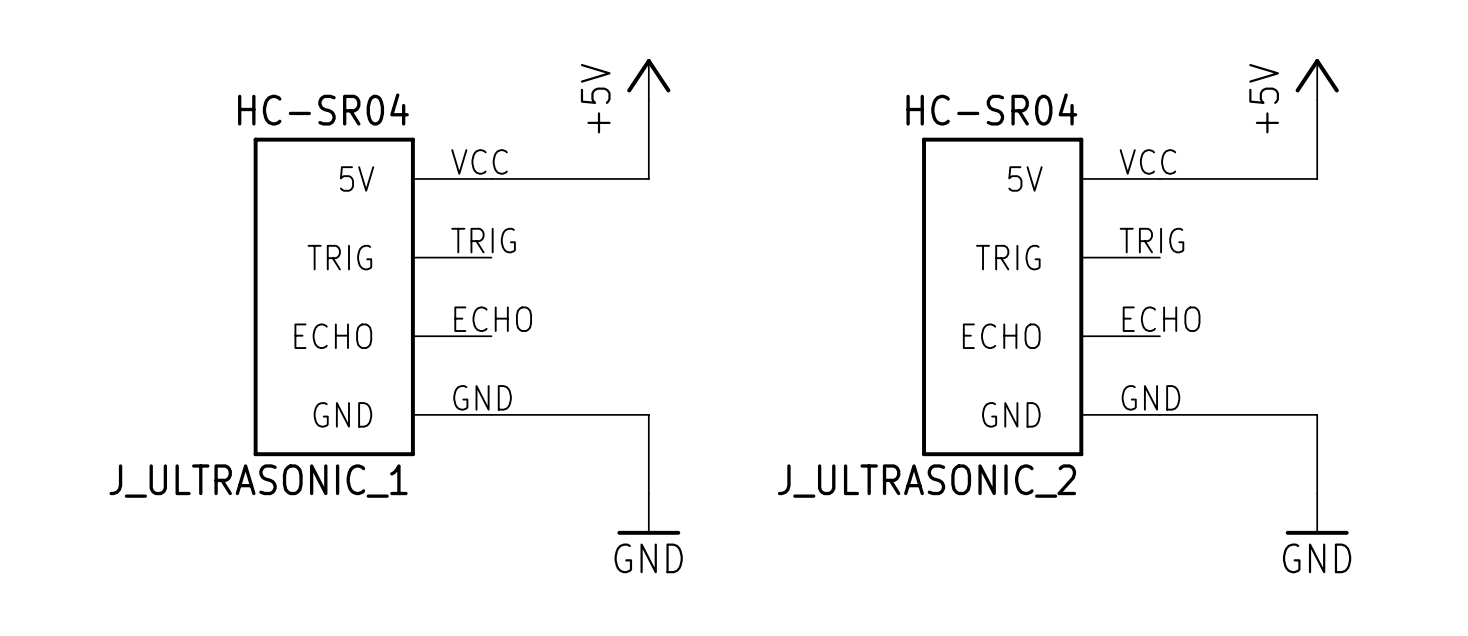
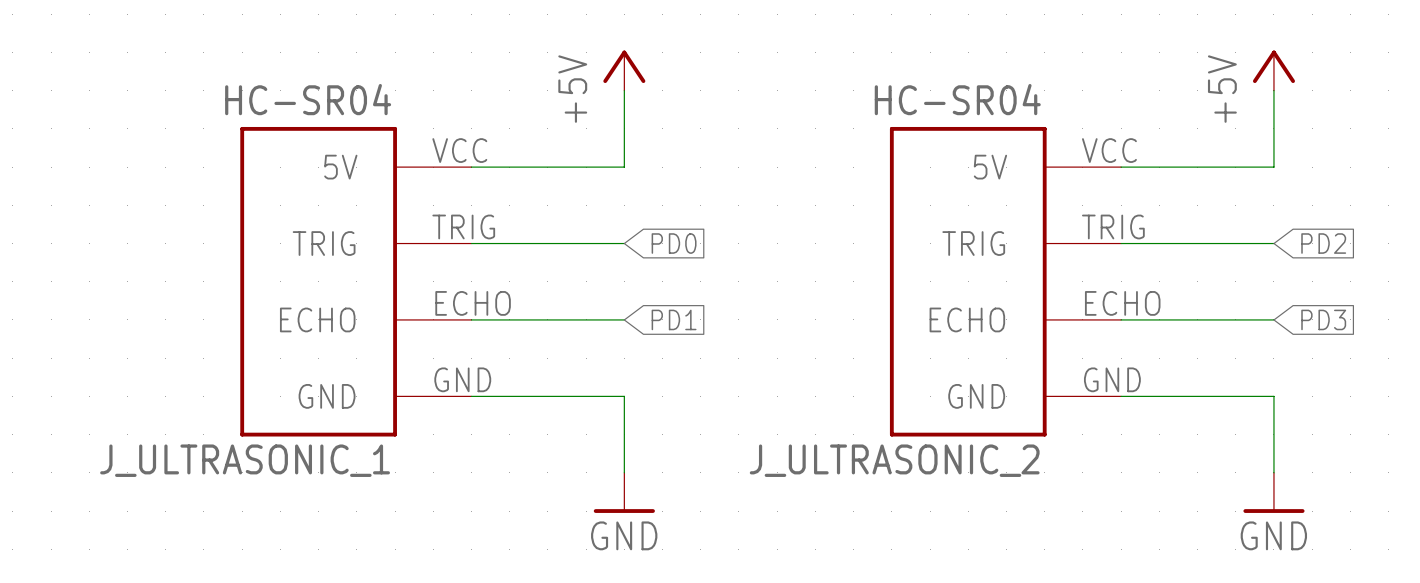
wire: none -> (471, 243) (624, 243)
global label: none -> PD0 (674, 243)
wire: none -> (1121, 243) (1273, 243)
global label: none -> PD2 (1323, 243)
wire: none -> (471, 319) (624, 319)
global label: none -> PD1 (674, 319)
wire: none -> (1121, 319) (1273, 319)
global label: none -> PD3 (1323, 319)

